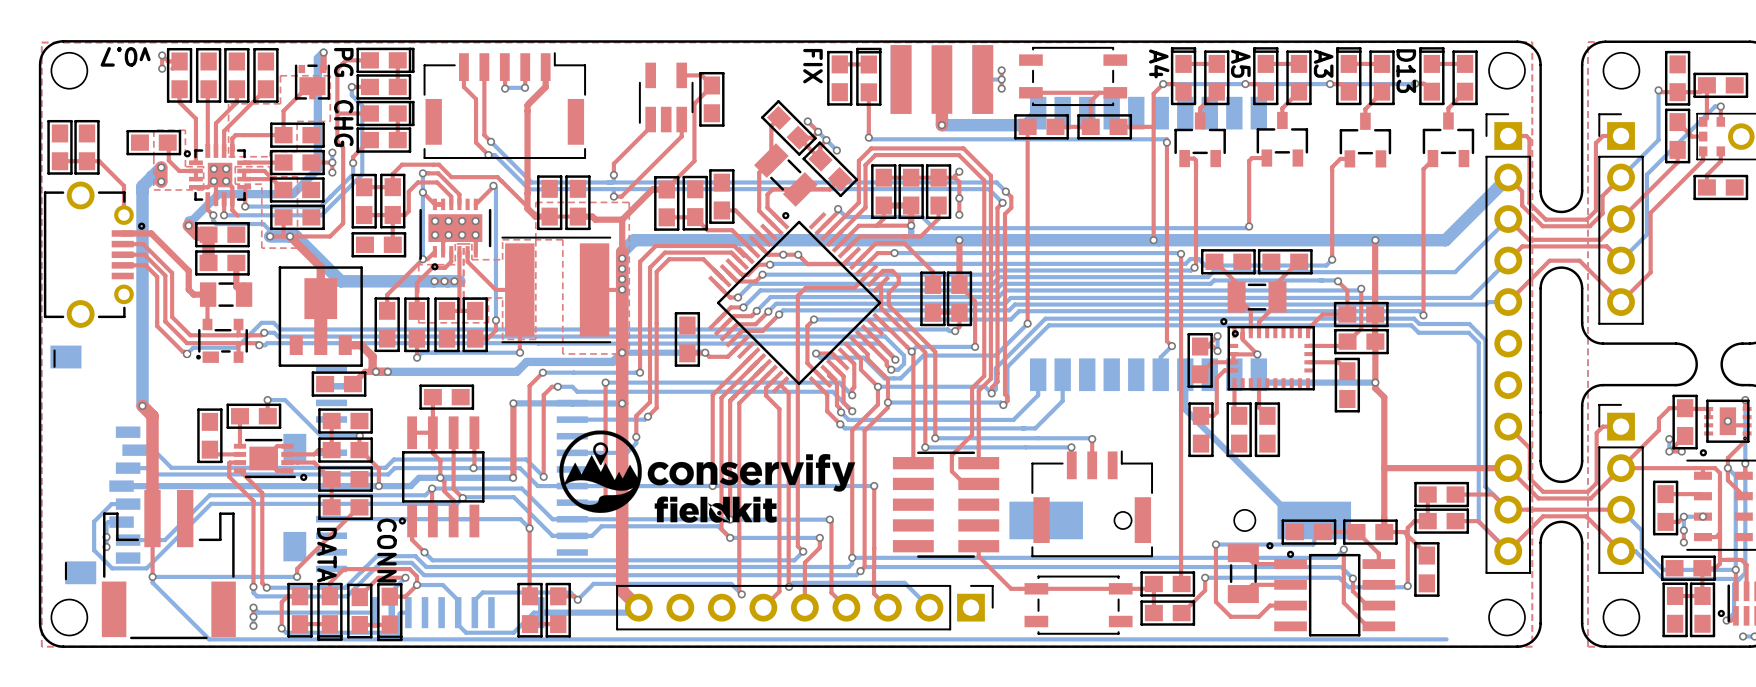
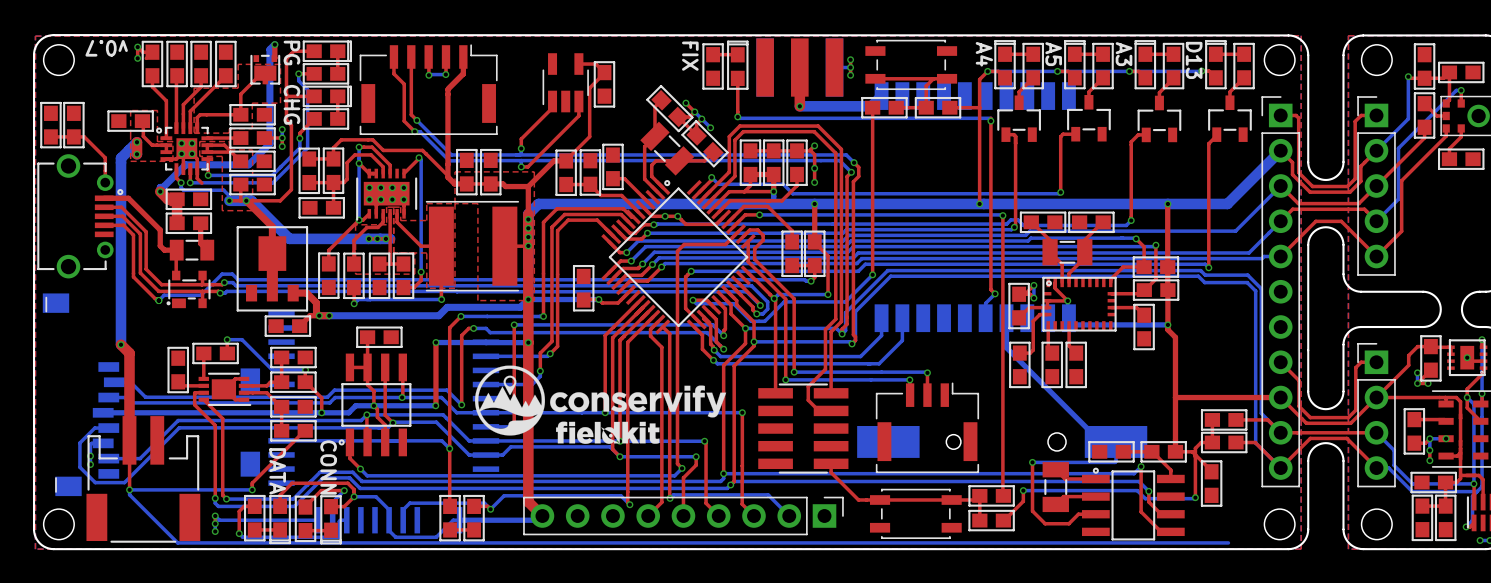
drawing: [431, 263, 439, 271] -> none
drawing: [1220, 317, 1228, 326] -> none
drawing: [1699, 449, 1707, 457] -> none
drawing: [300, 473, 308, 481] -> none
drawing: [1266, 542, 1274, 550] -> none
drawing: [1717, 609, 1725, 618] -> none

